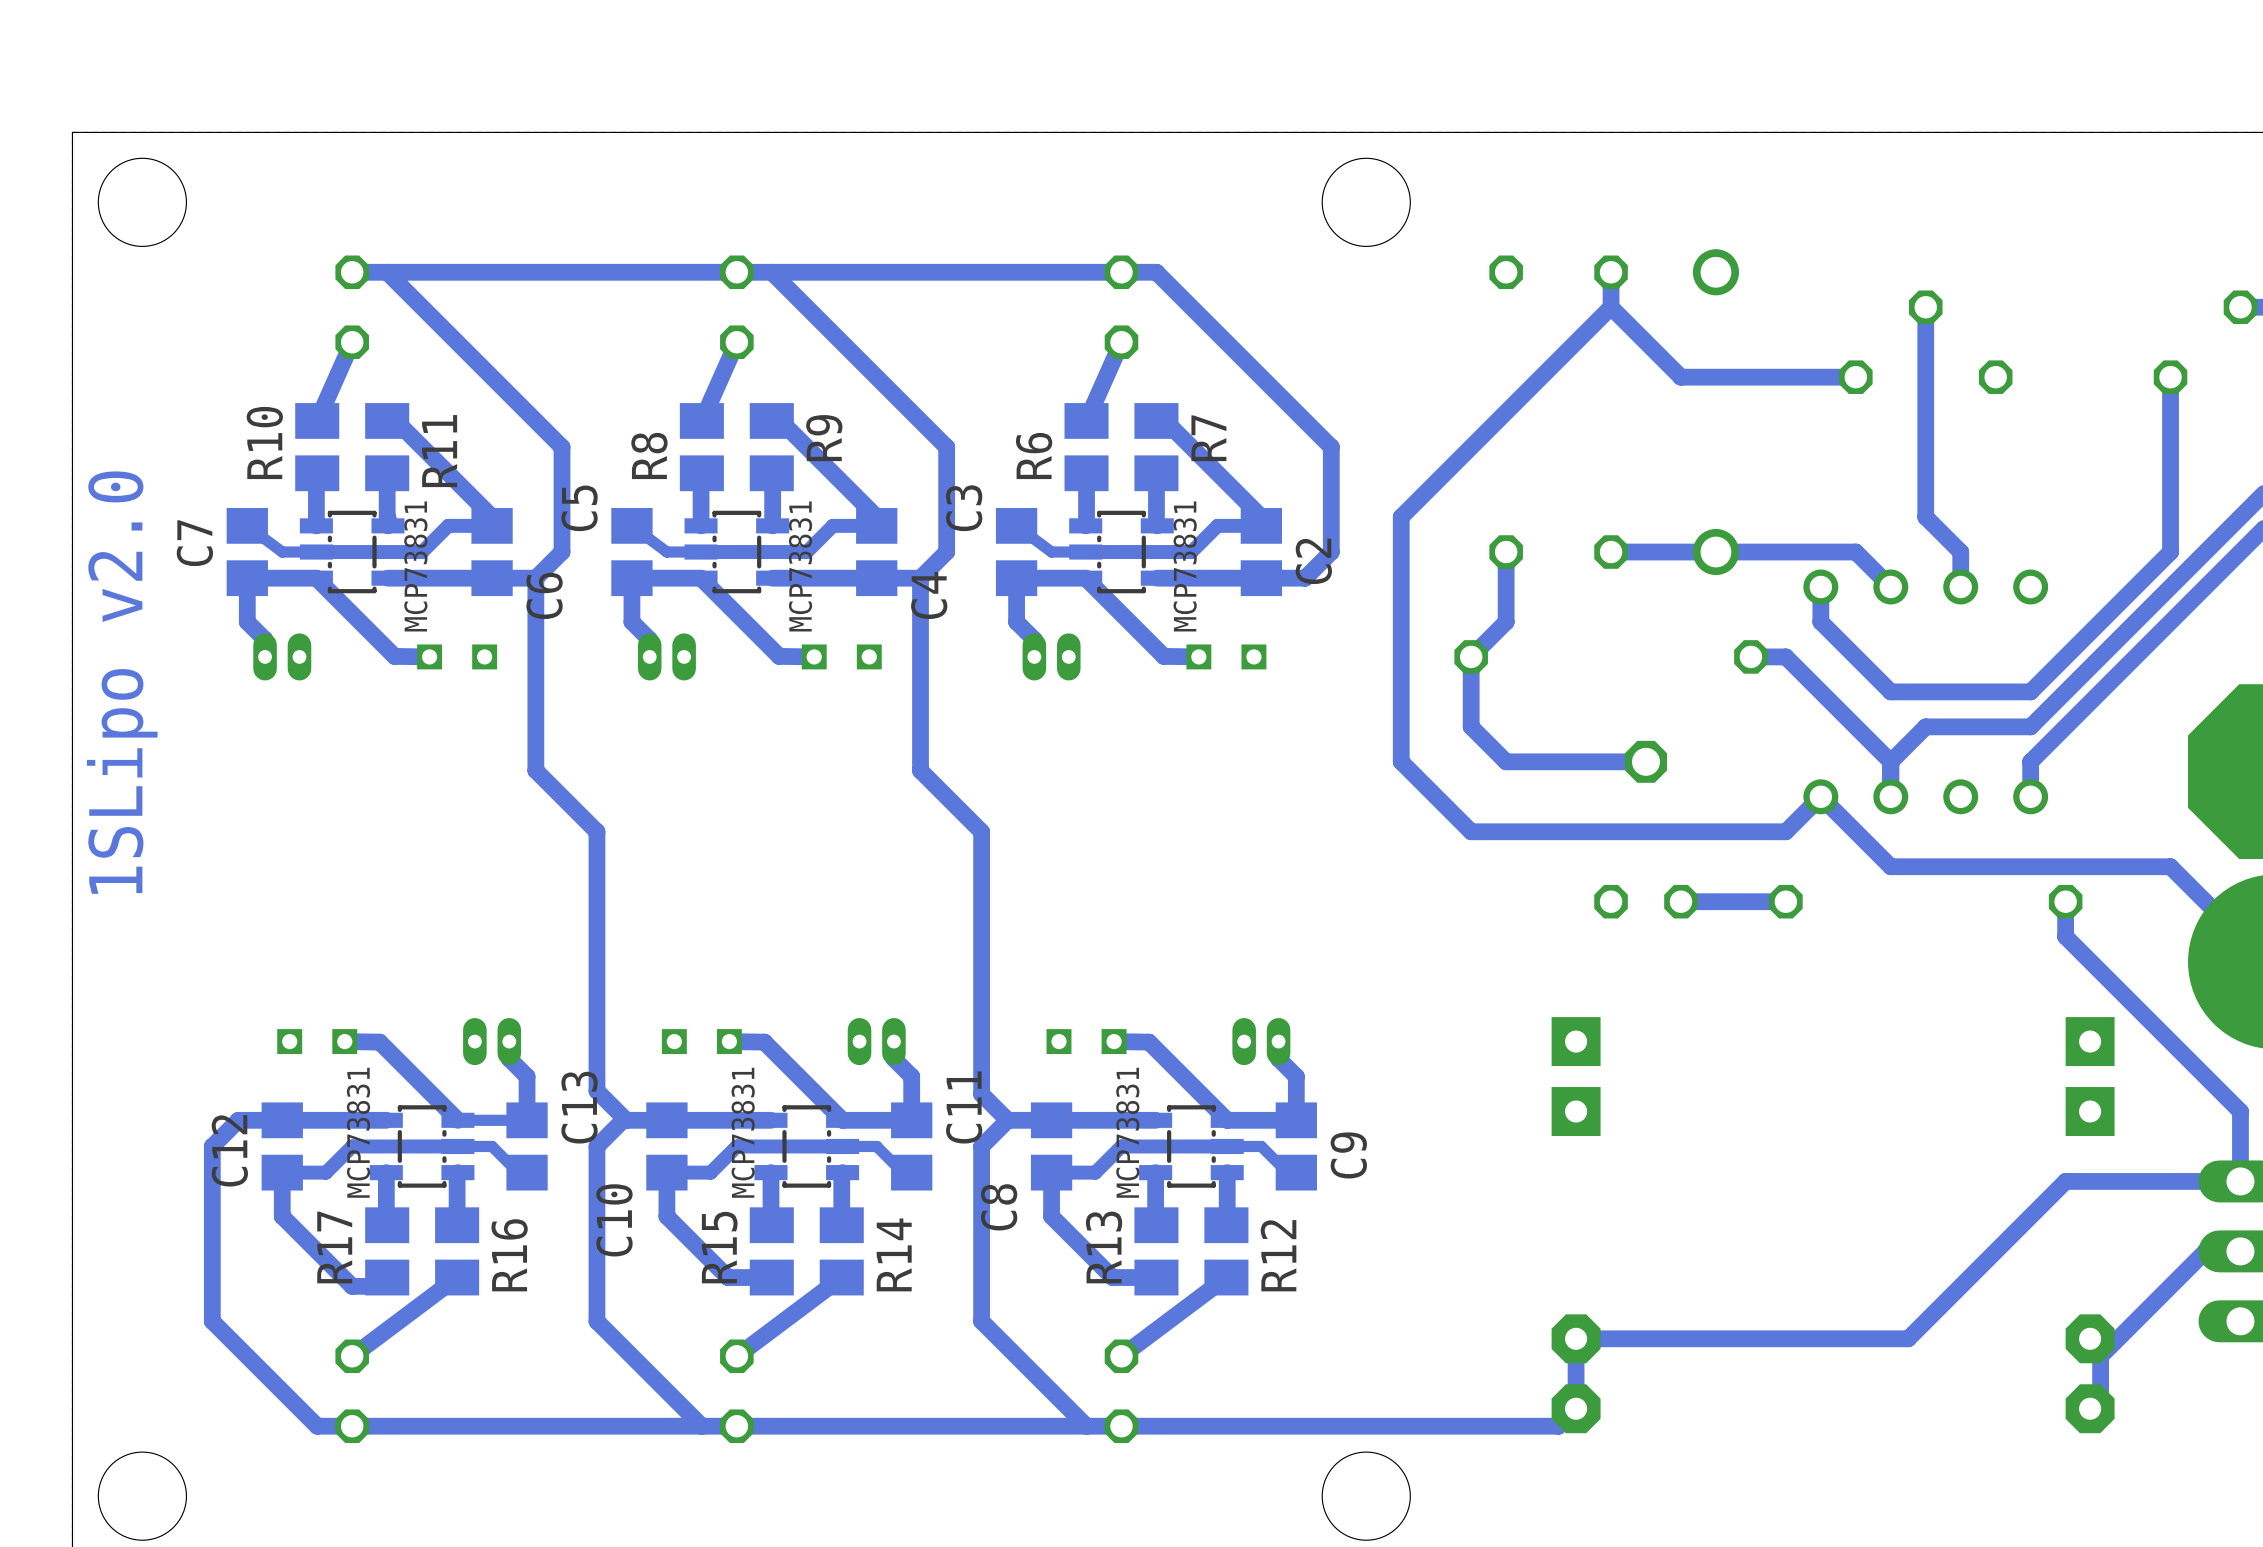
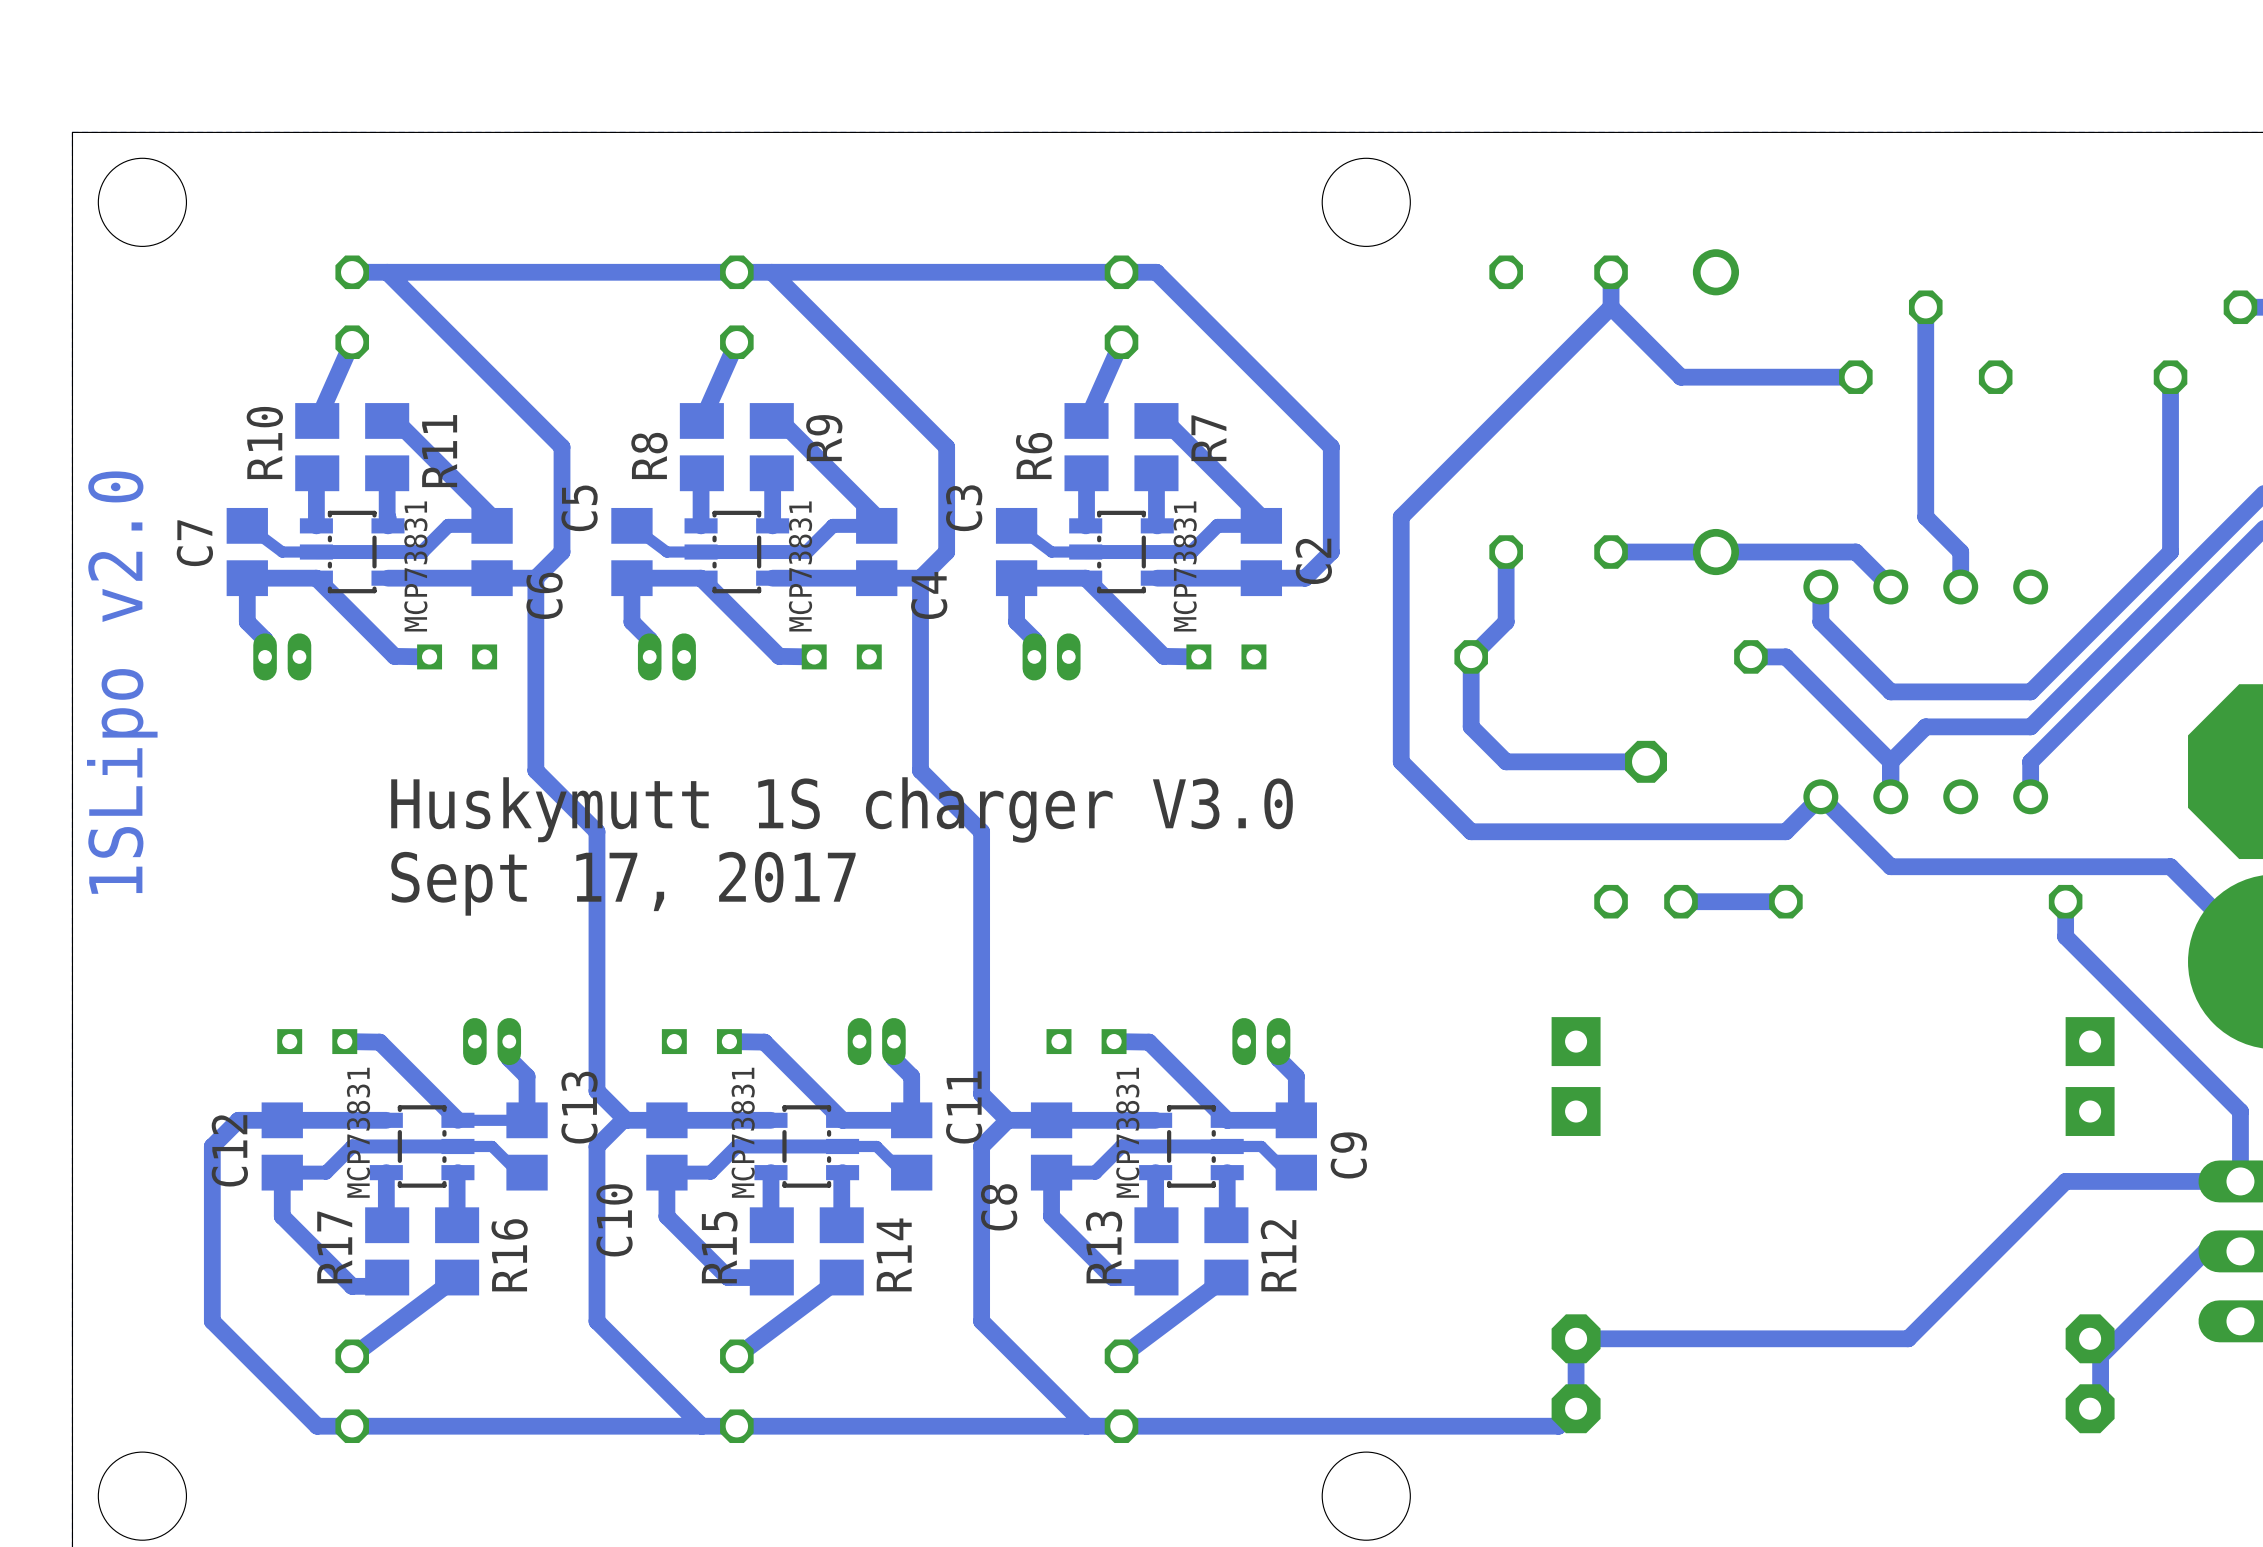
text: none -> Huskymutt 1S charger V3.0 (842, 809)
text: none -> Sept 17, 2017 (623, 883)

